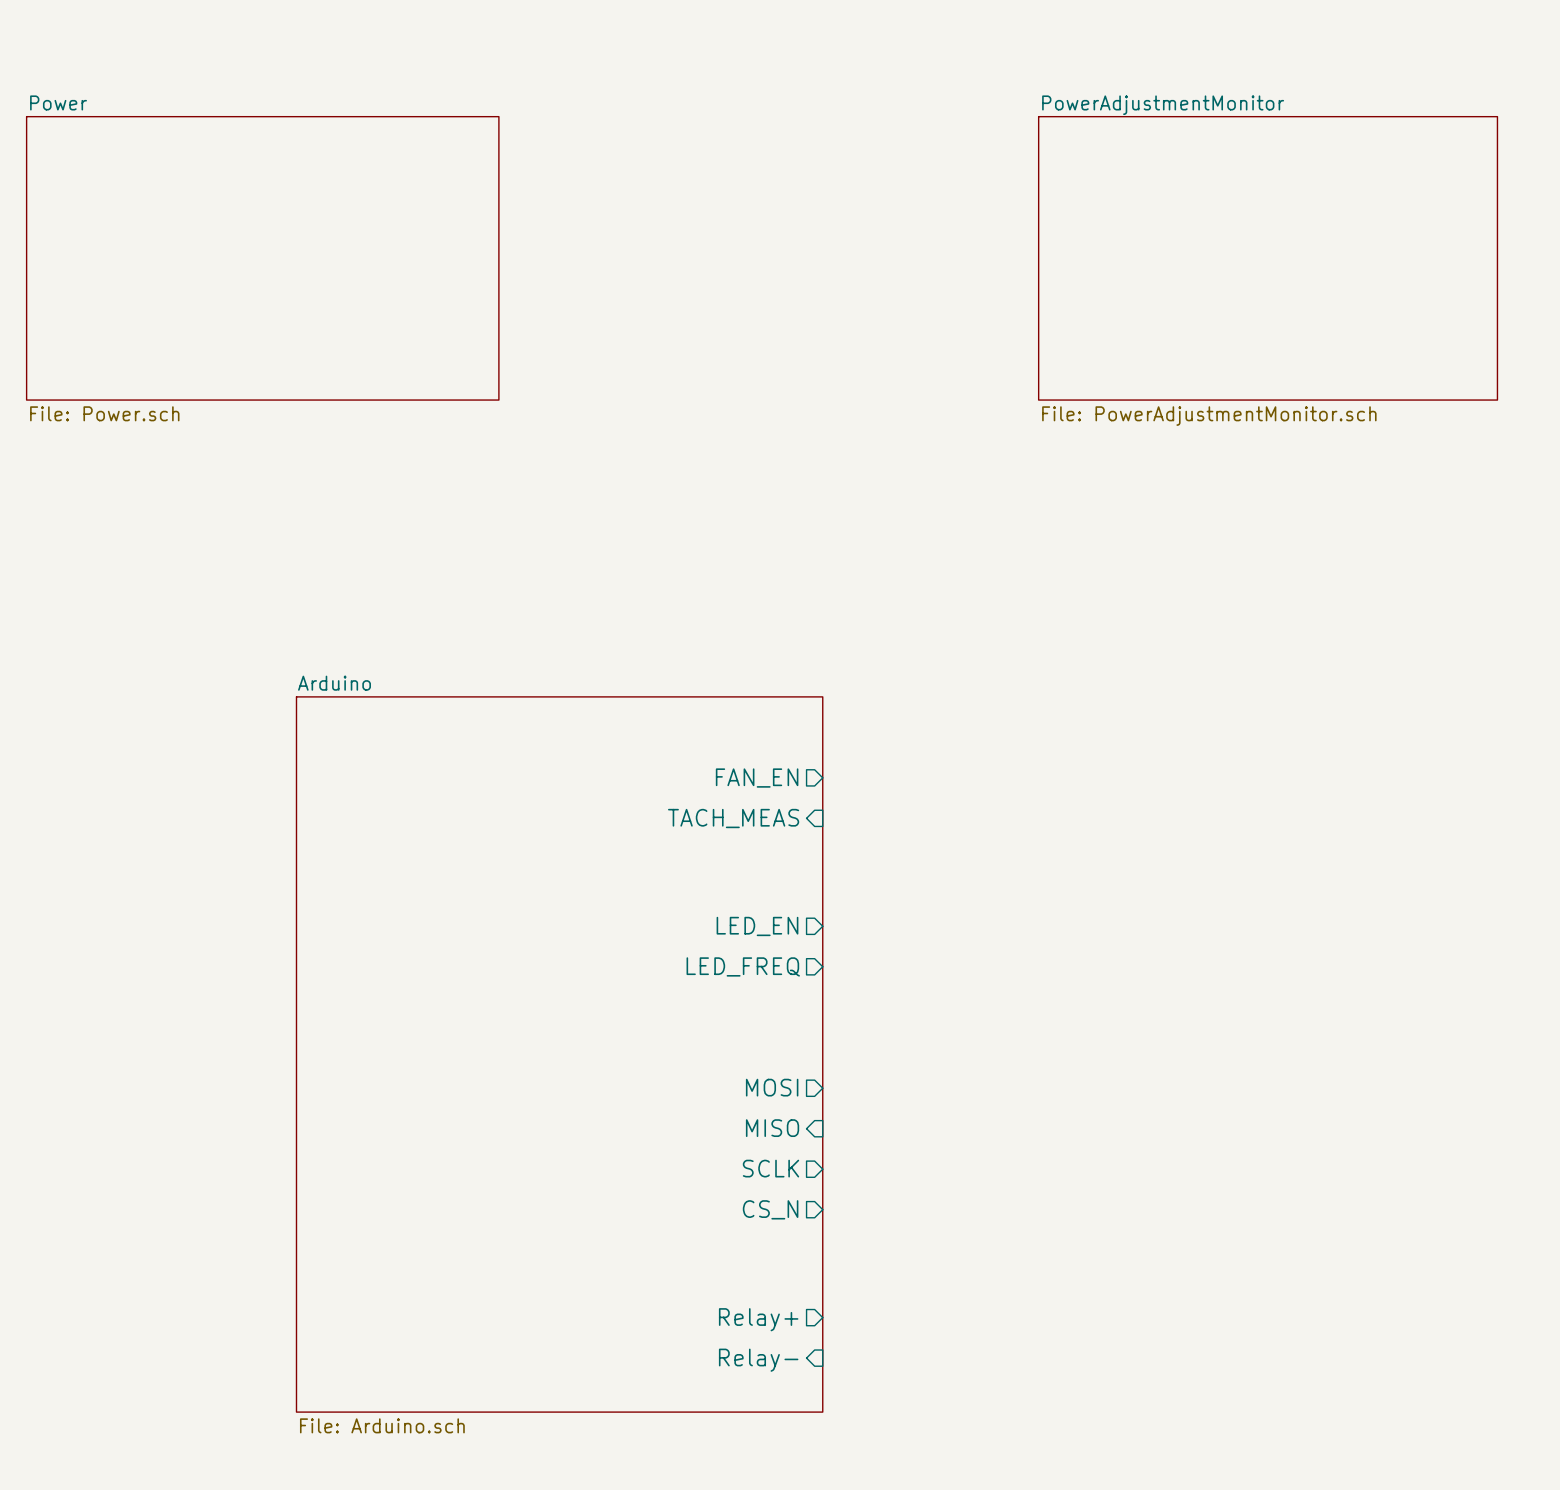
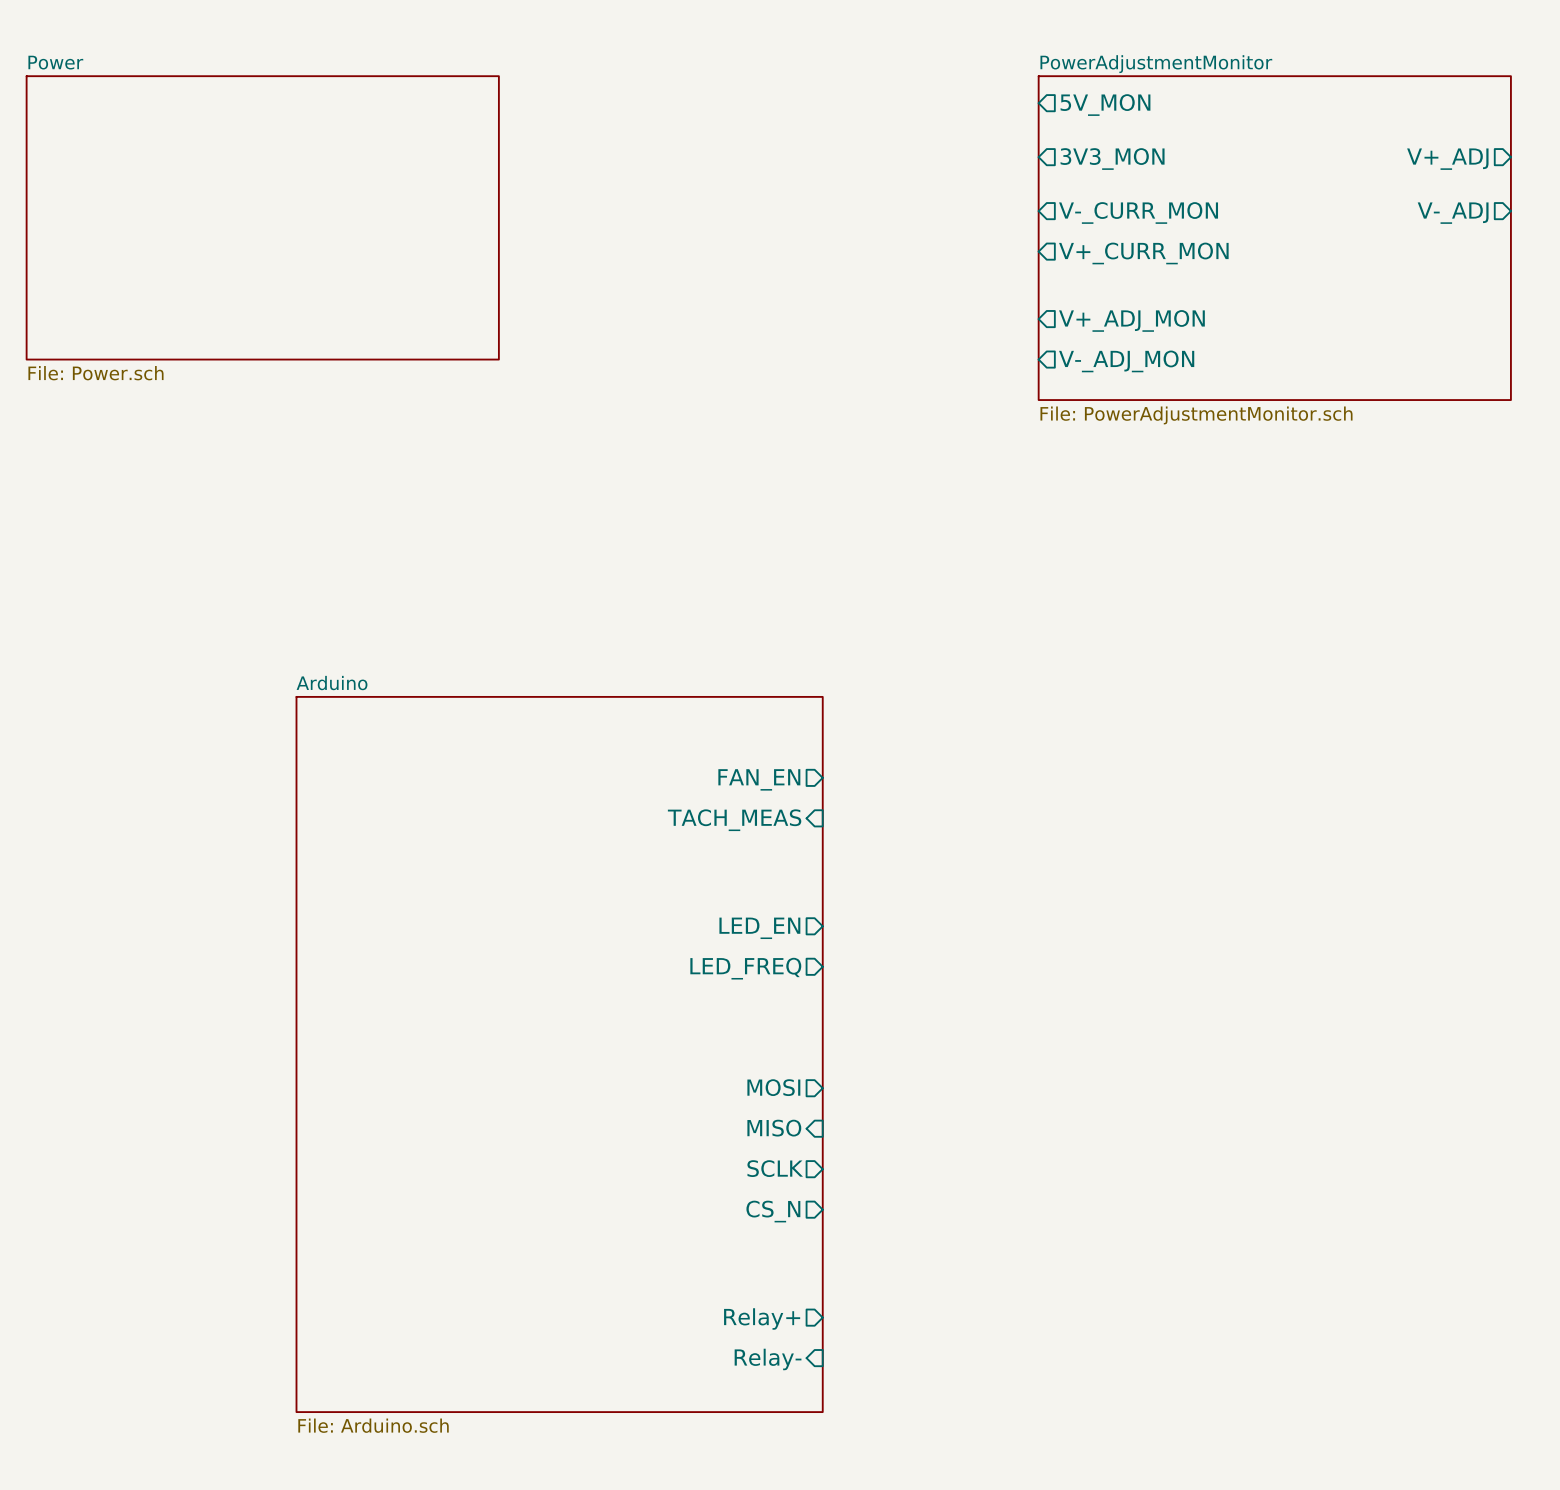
sheet pin: none -> 5V_MON (1105, 105)
sheet pin: none -> 3V3_MON (1112, 159)
sheet pin: none -> V+_ADJ (1447, 159)
sheet pin: none -> V-_CURR_MON (1138, 212)
sheet pin: none -> V-_ADJ (1453, 213)
sheet PowerAdjustmentMonitor: none -> File: PowerAdjustmentMonitor.sch (1274, 238)
sheet pin: none -> V+_CURR_MON (1143, 253)
sheet Power position: (262, 258) -> (262, 217)
sheet PowerAdjustmentMonitor: File: PowerAdjustmentMonitor.sch (1268, 258) -> none
sheet pin: none -> V+_ADJ_MON (1131, 320)
sheet pin: none -> V-_ADJ_MON (1126, 361)

